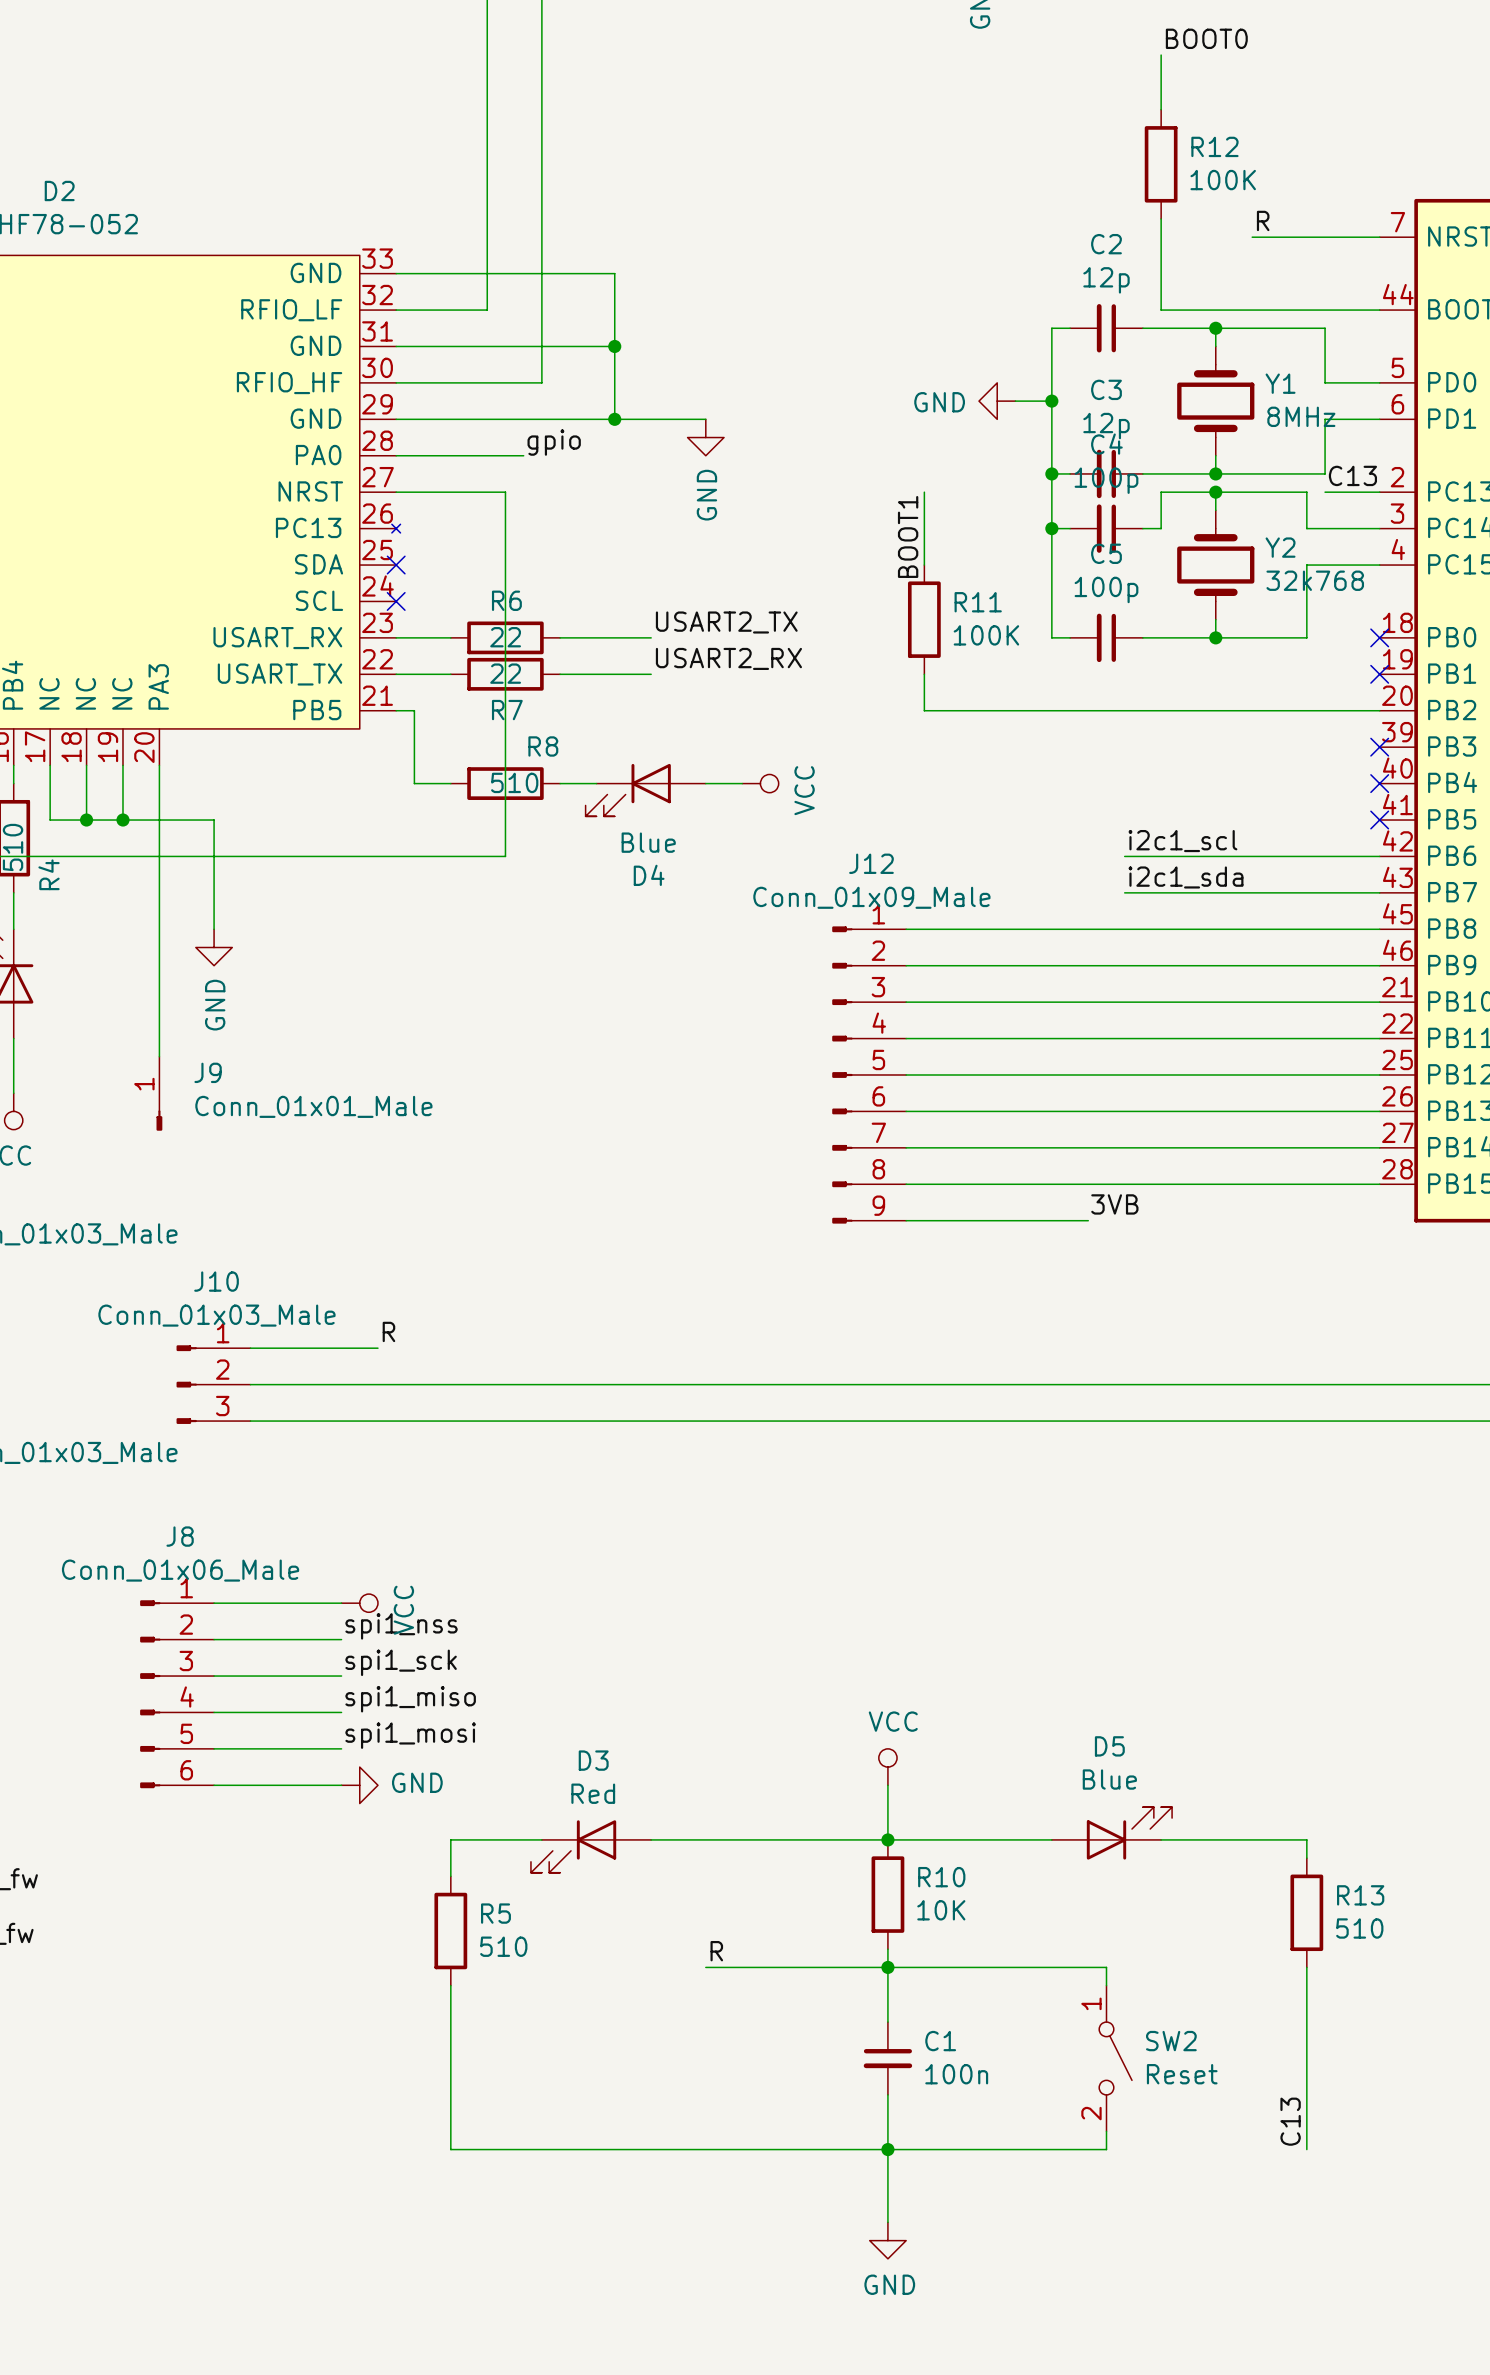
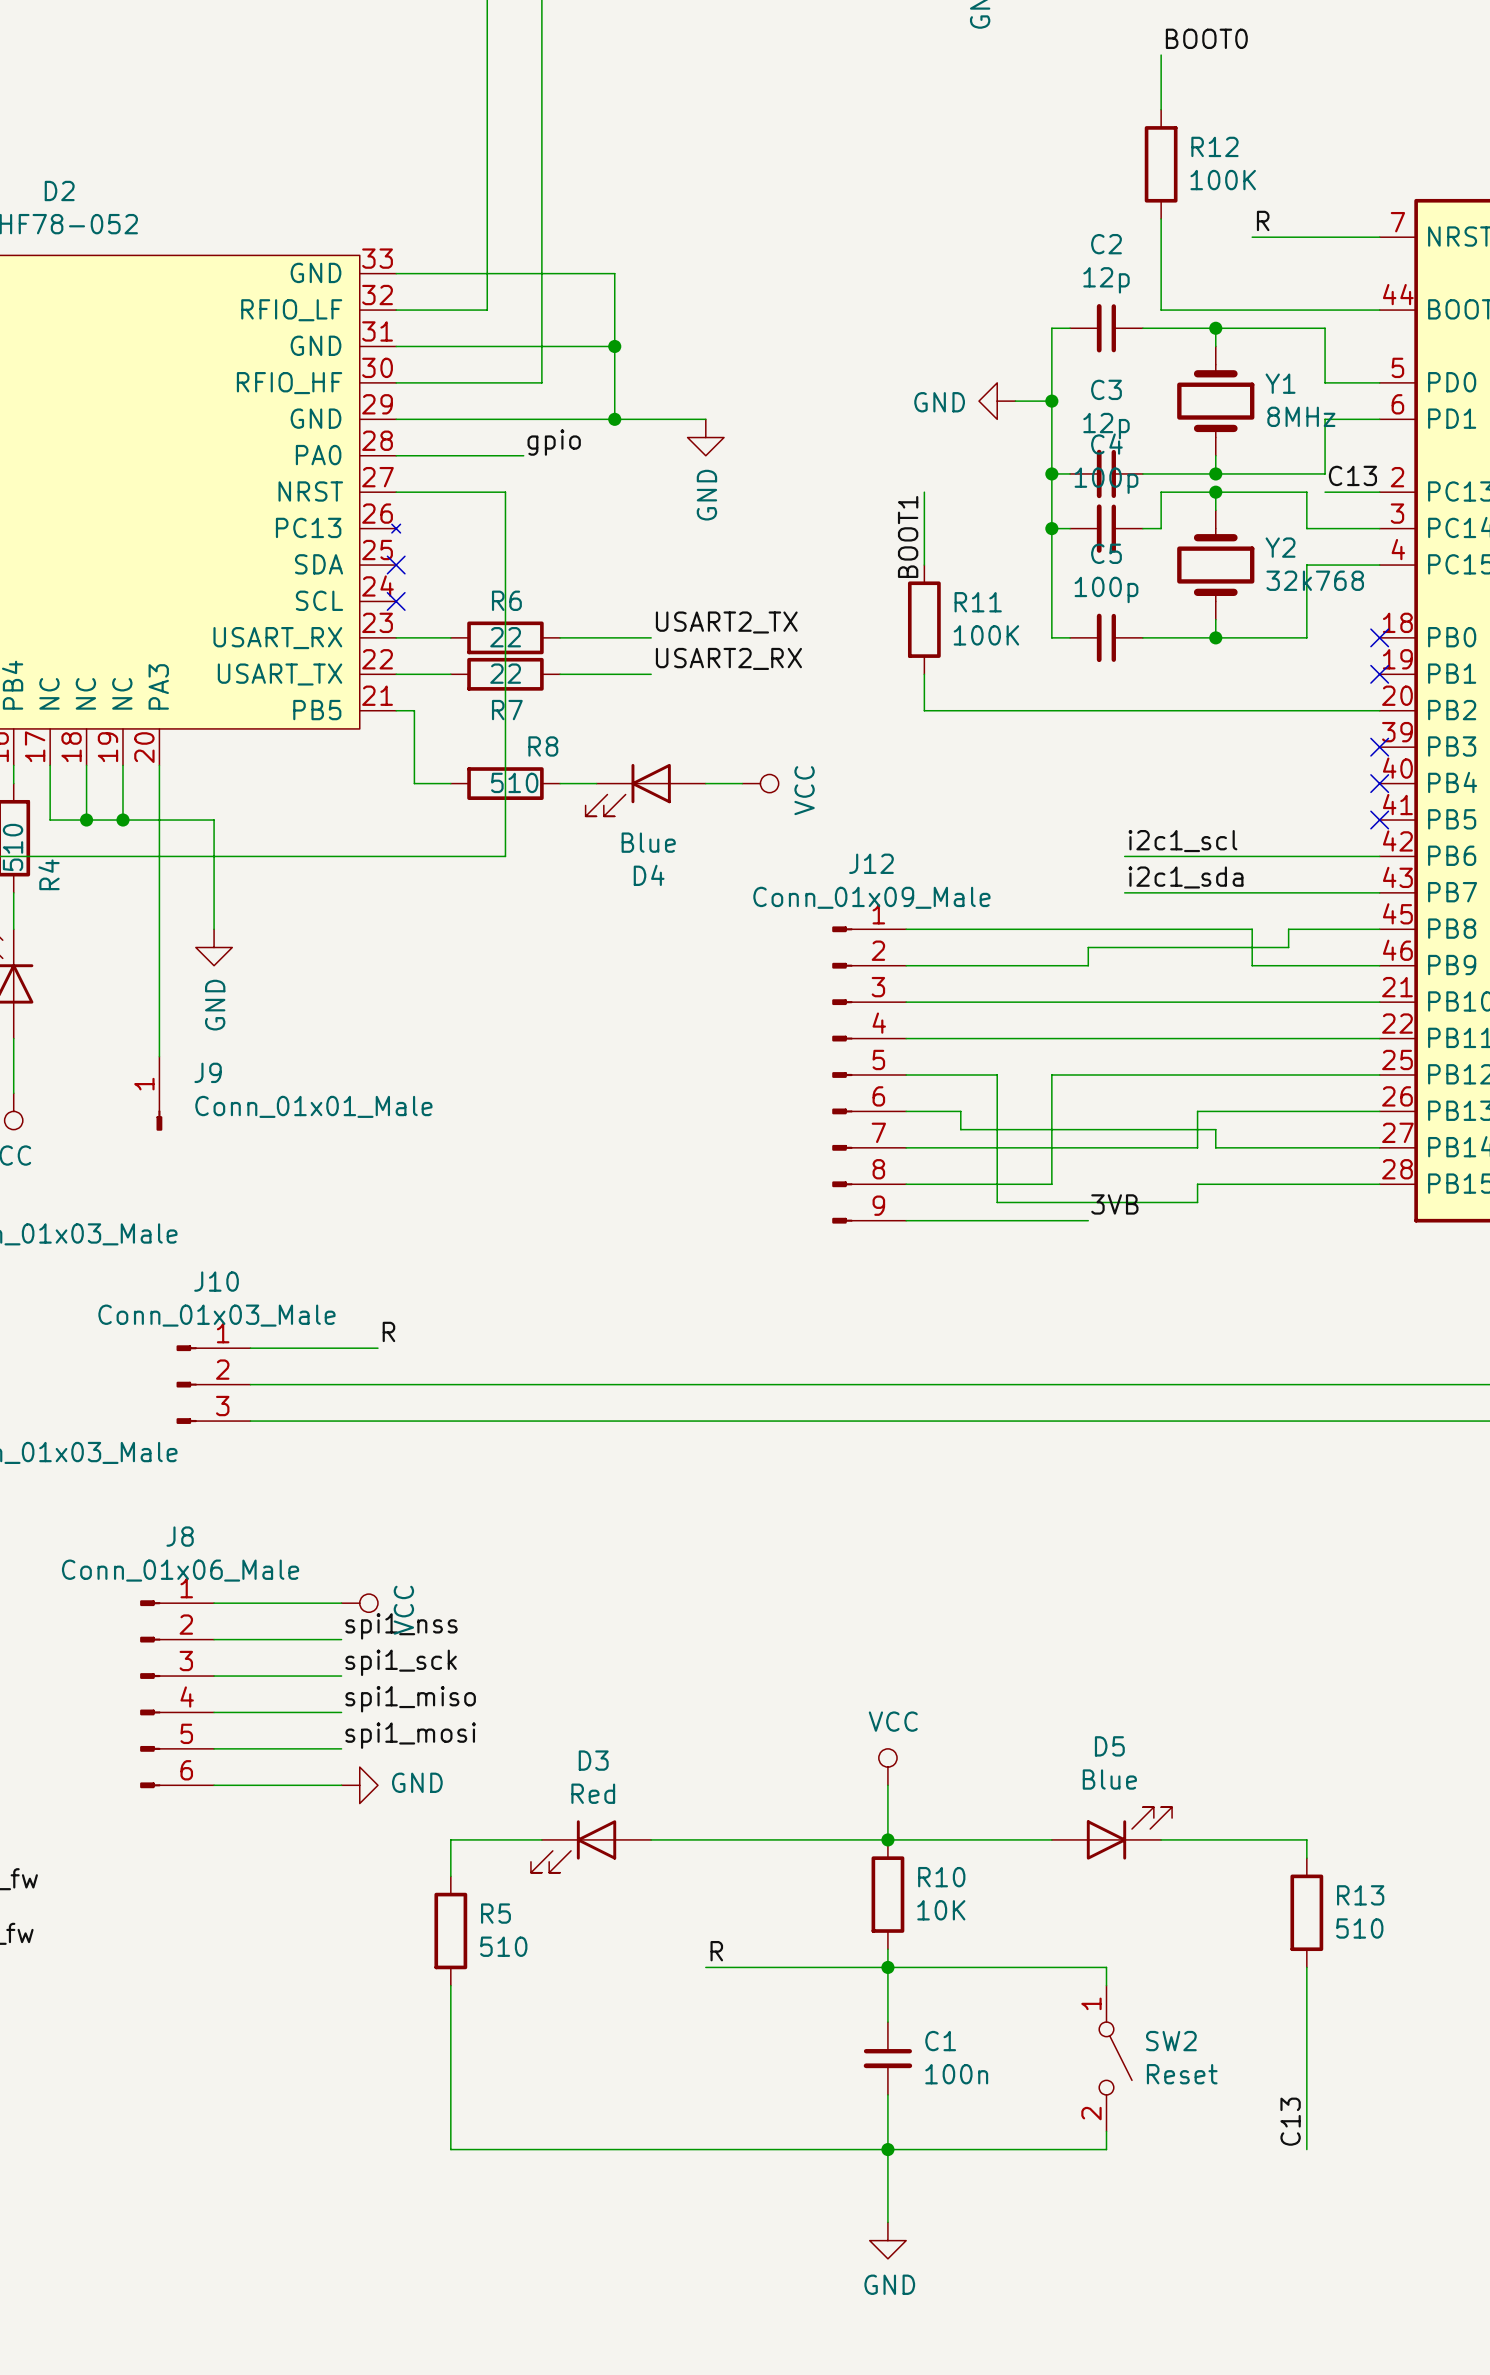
wire: (1252, 929) (1288, 929) -> (1252, 929) (1252, 965)
wire: (1088, 965) (1252, 965) -> (1088, 965) (1088, 947) (1288, 947) (1288, 929)
wire: (997, 1074) (1051, 1074) -> (1051, 1184) (1051, 1074)
wire: (960, 1111) (1197, 1111) -> (960, 1111) (960, 1129) (1215, 1129) (1215, 1147)
wire: (1197, 1147) (1215, 1147) -> (1197, 1147) (1197, 1111)
wire: (1051, 1184) (1197, 1184) -> (997, 1074) (997, 1202) (1197, 1202) (1197, 1184)

